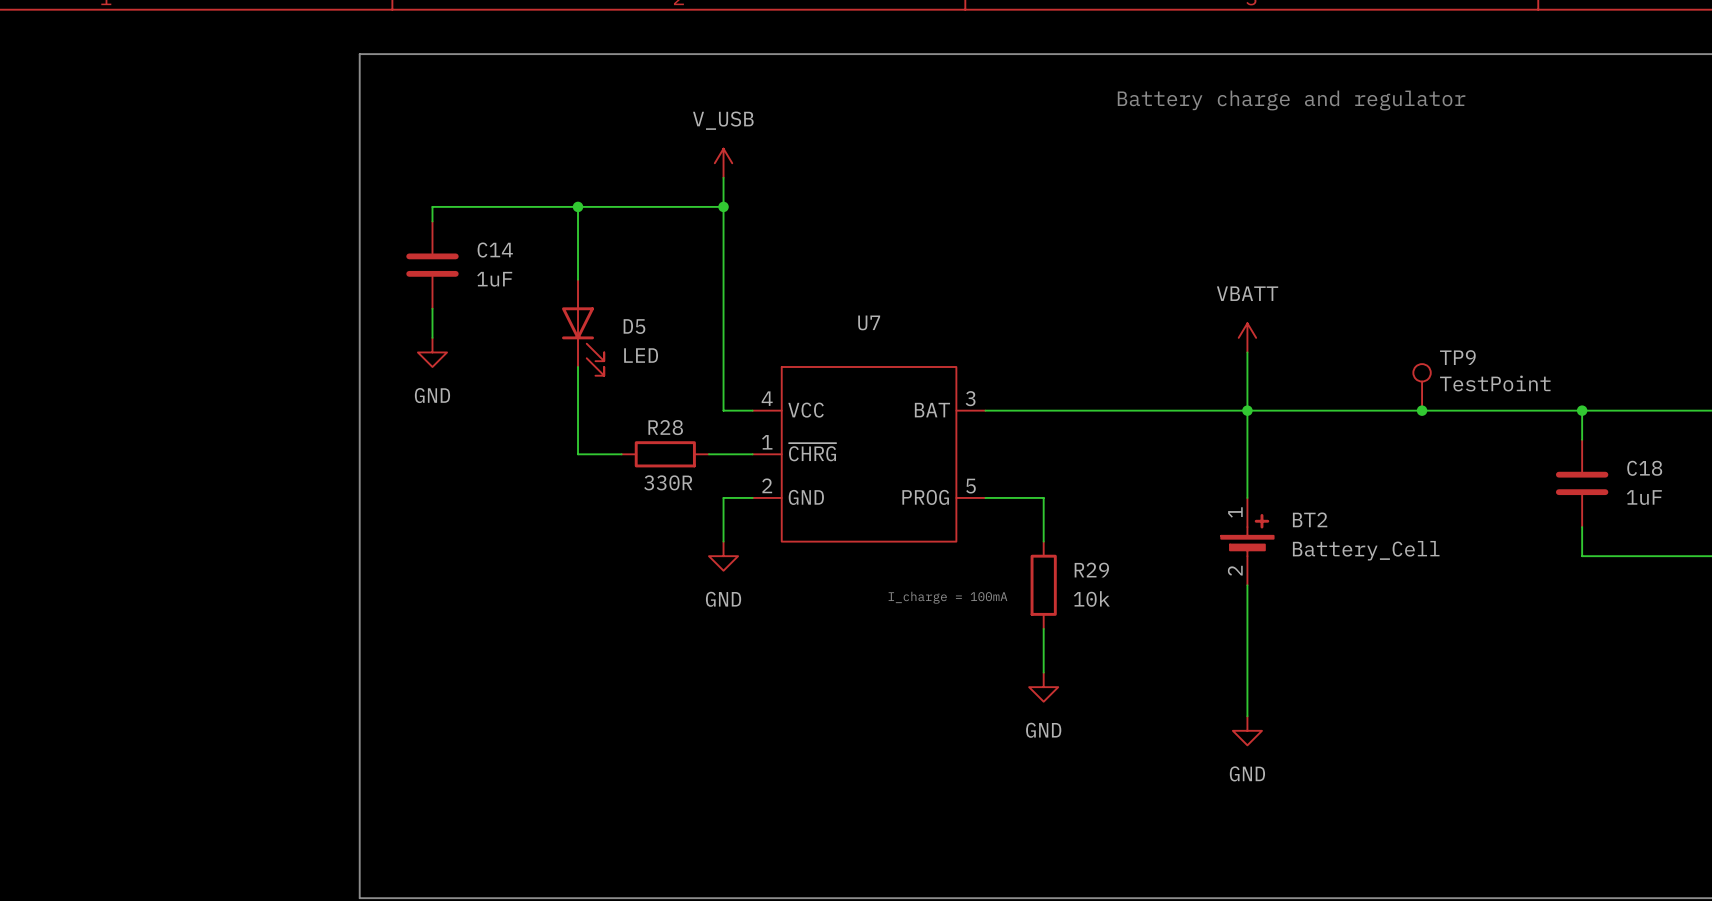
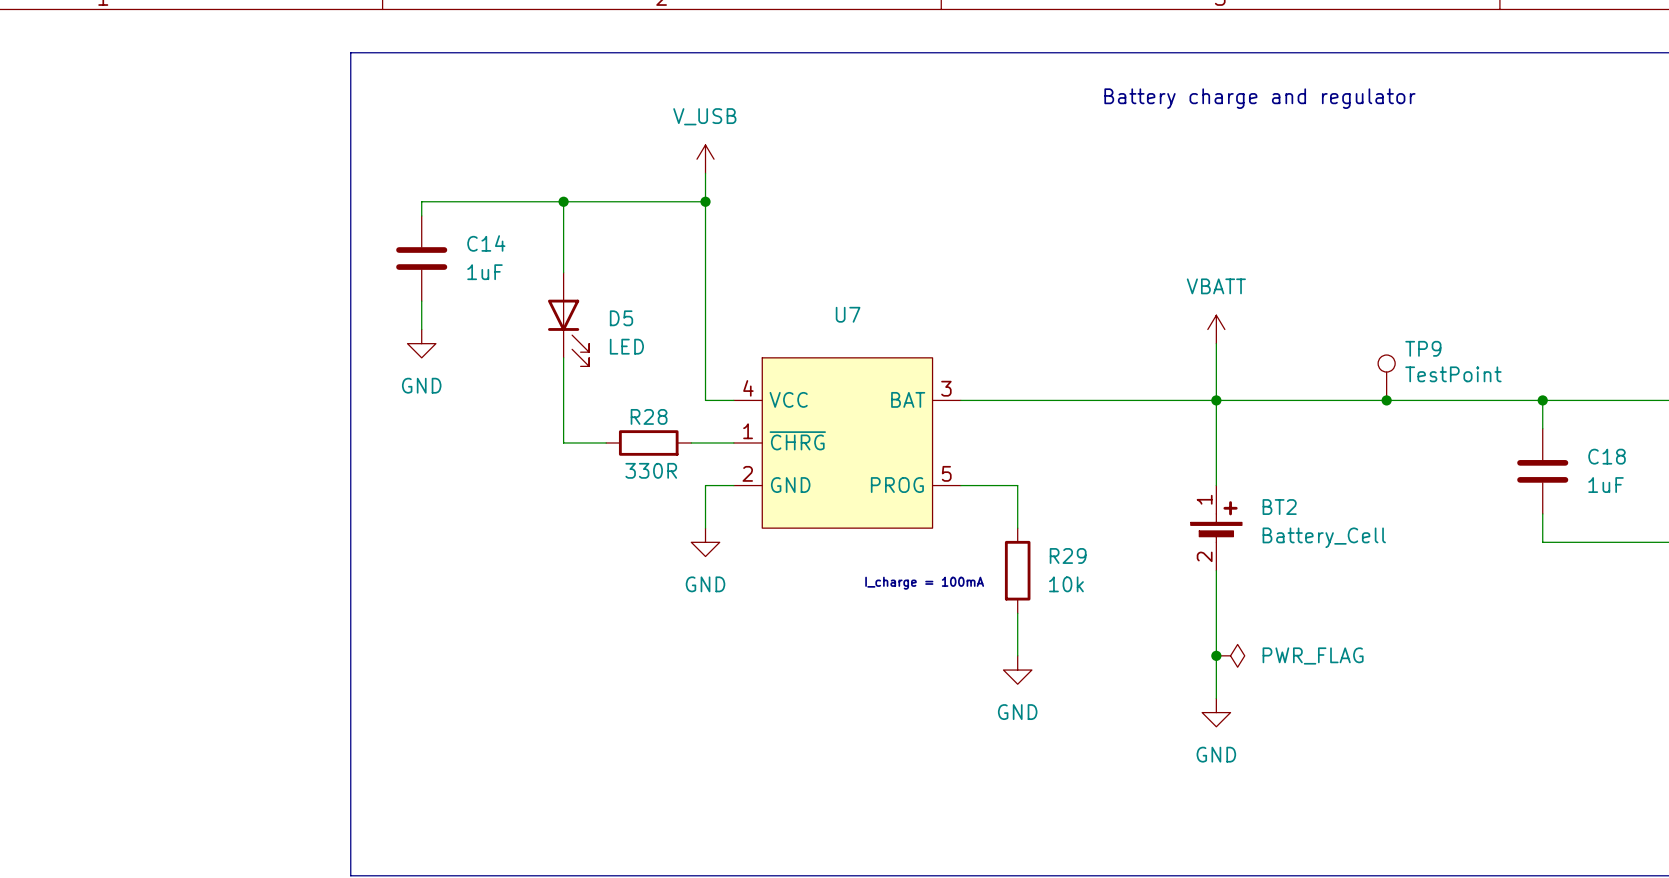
junction: none -> (1216, 655)
power symbol: none -> PWR_FLAG (1230, 655)

